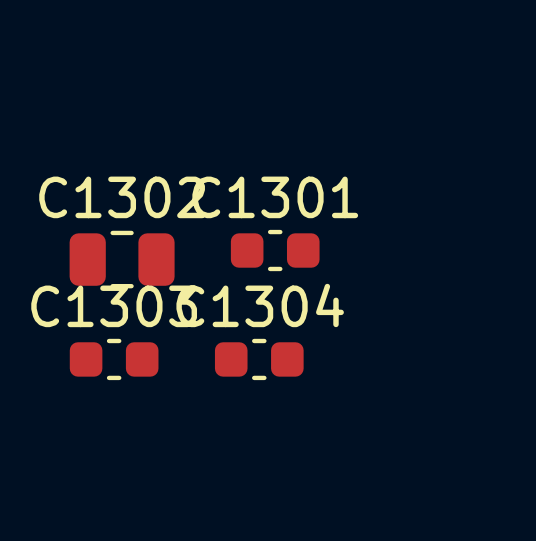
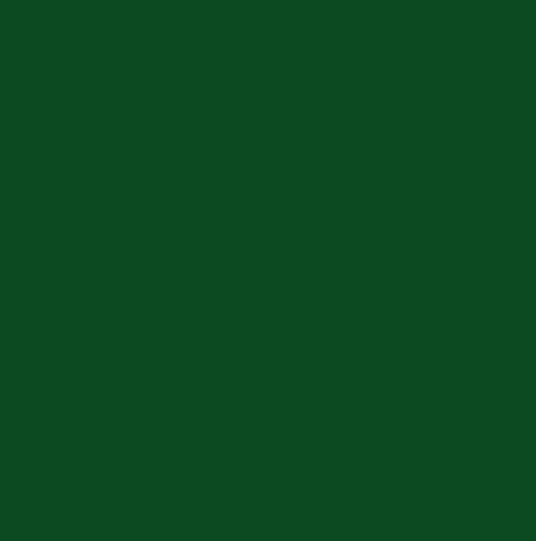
C1301: (275, 250) -> none
C1302: (122, 259) -> none
C1303: (114, 359) -> none
C1304: (259, 359) -> none

